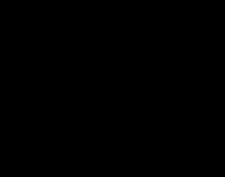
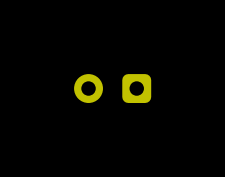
part: none -> (112, 88)

